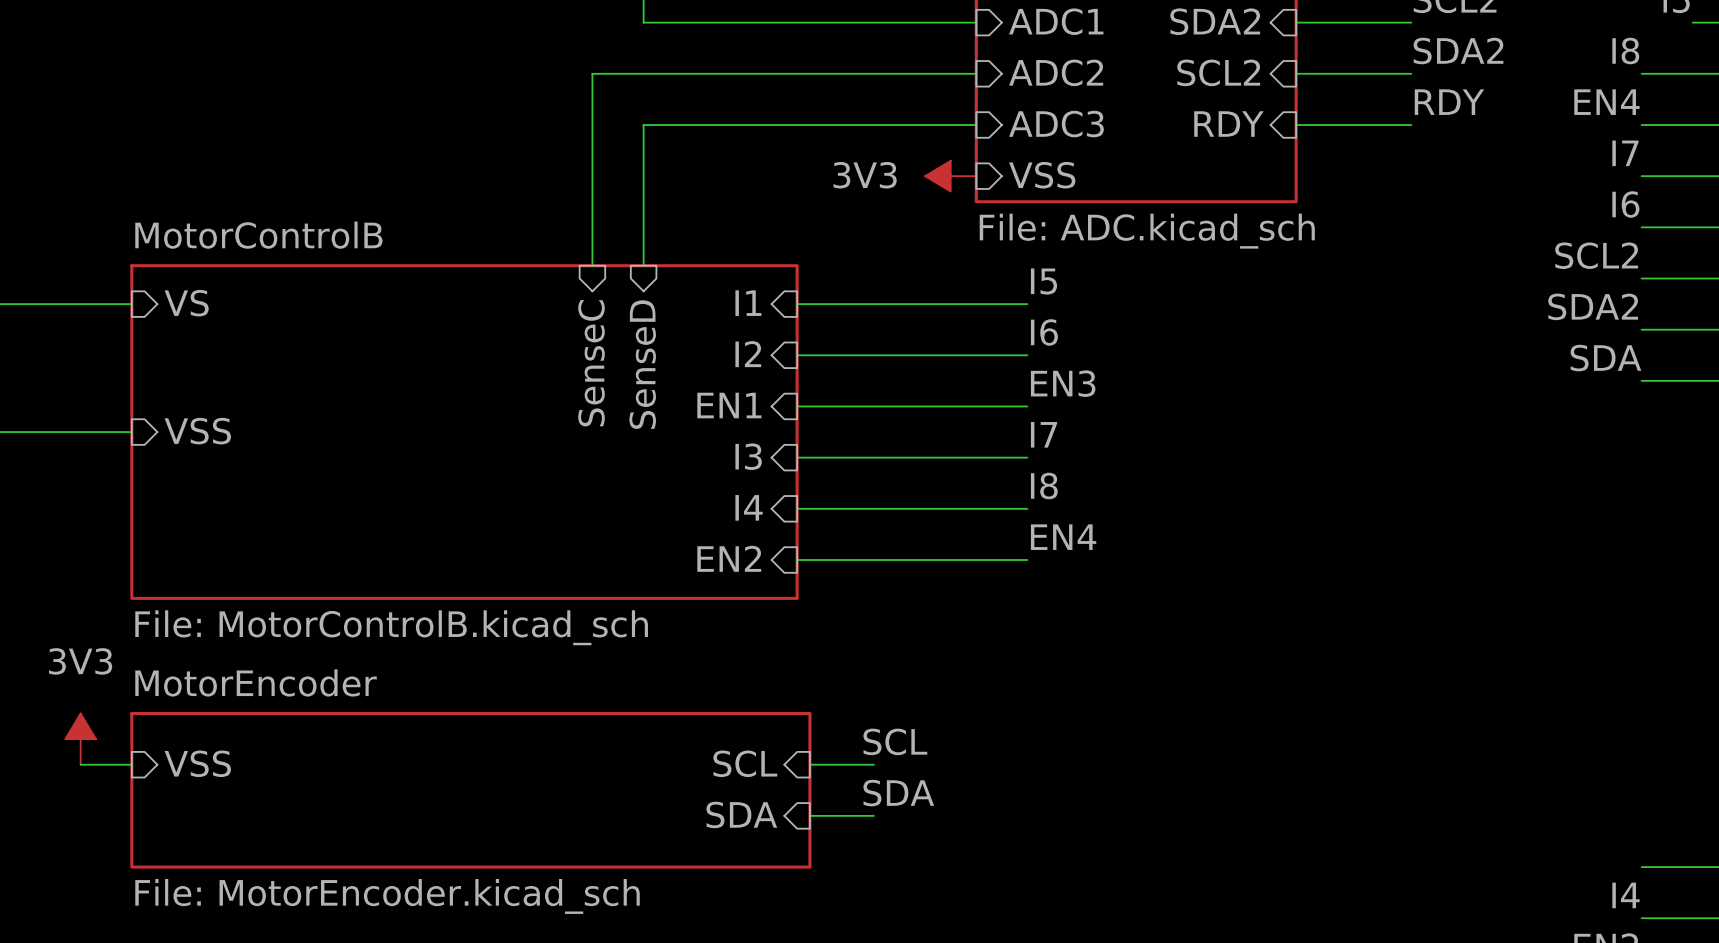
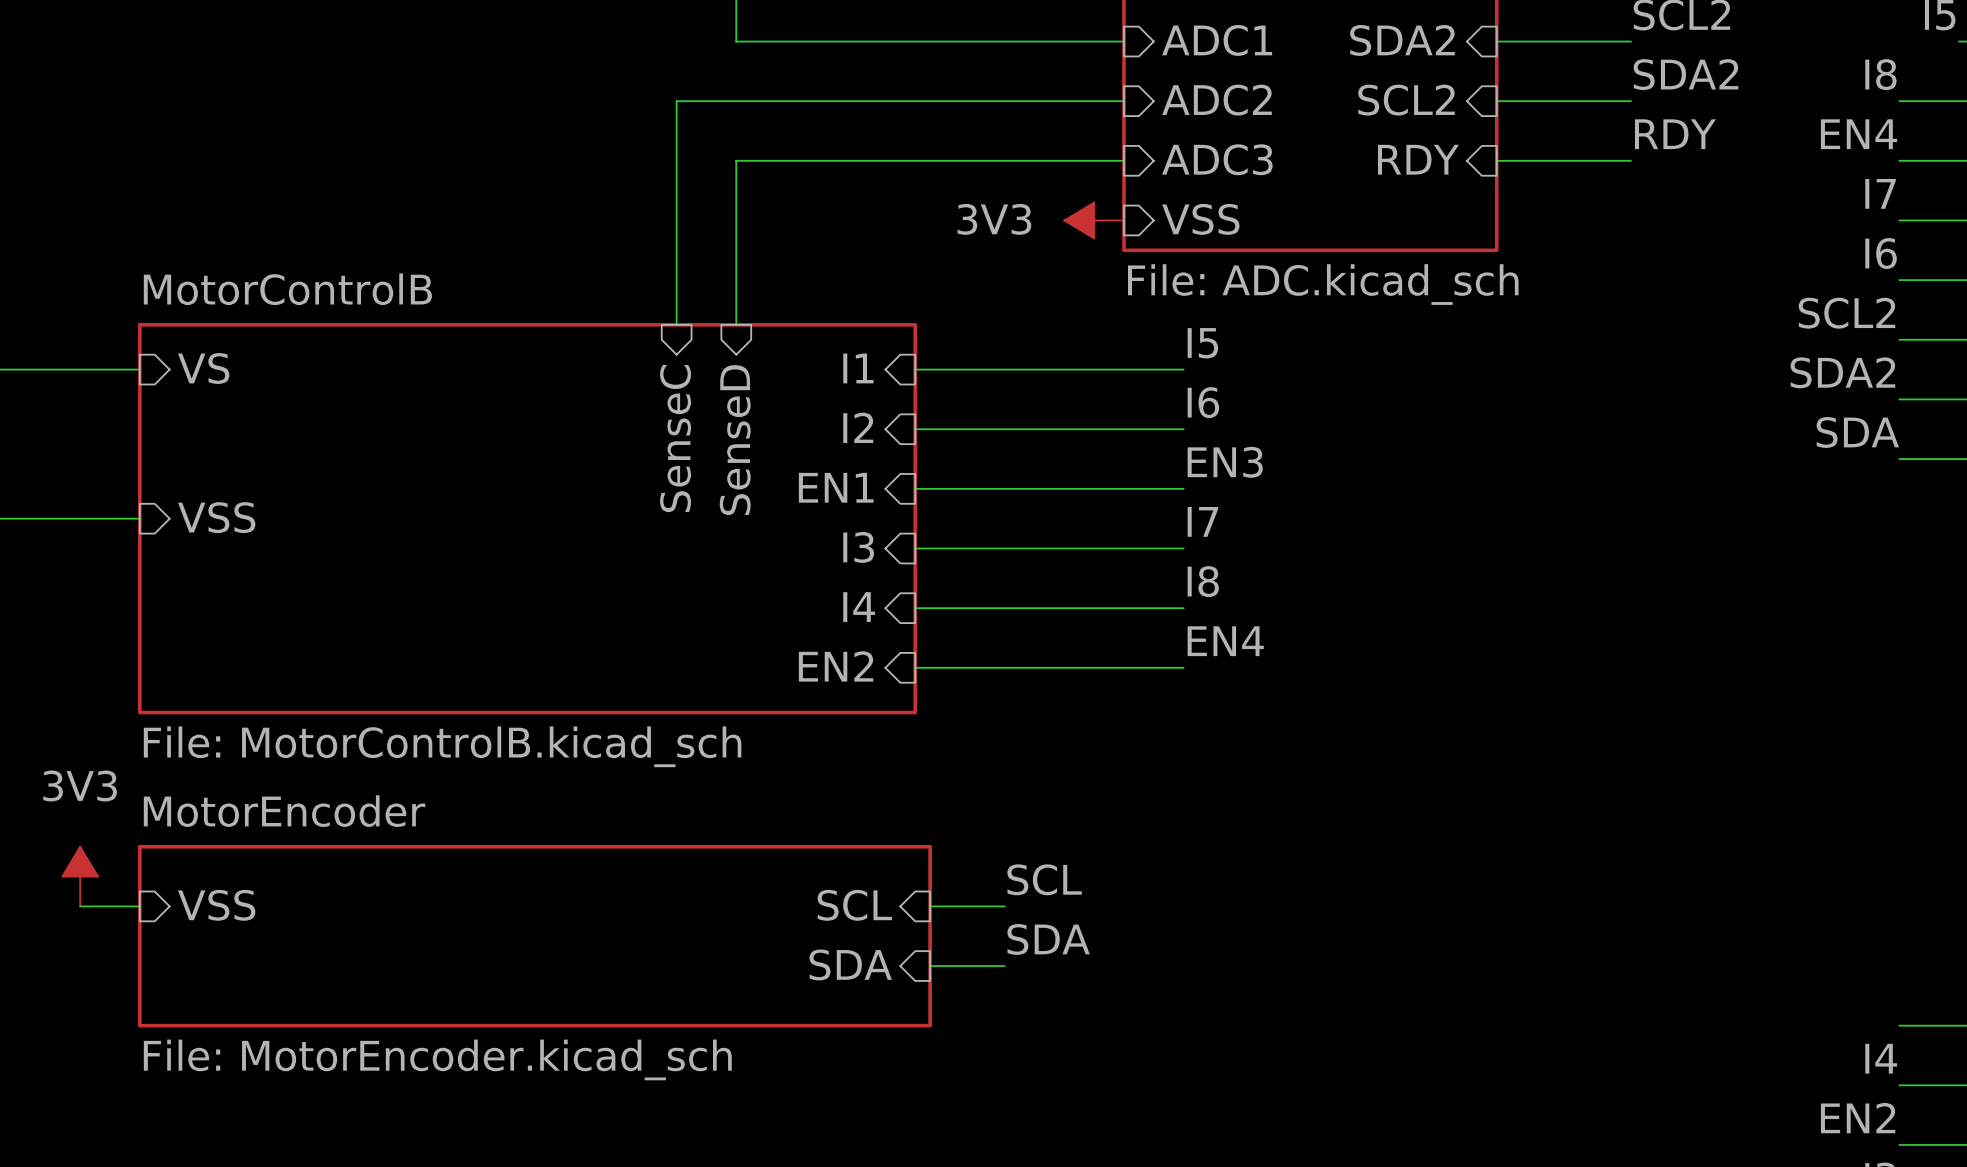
label position: SCL (895, 741) -> SCL (1044, 879)
label position: SDA (898, 793) -> SDA (1048, 939)

